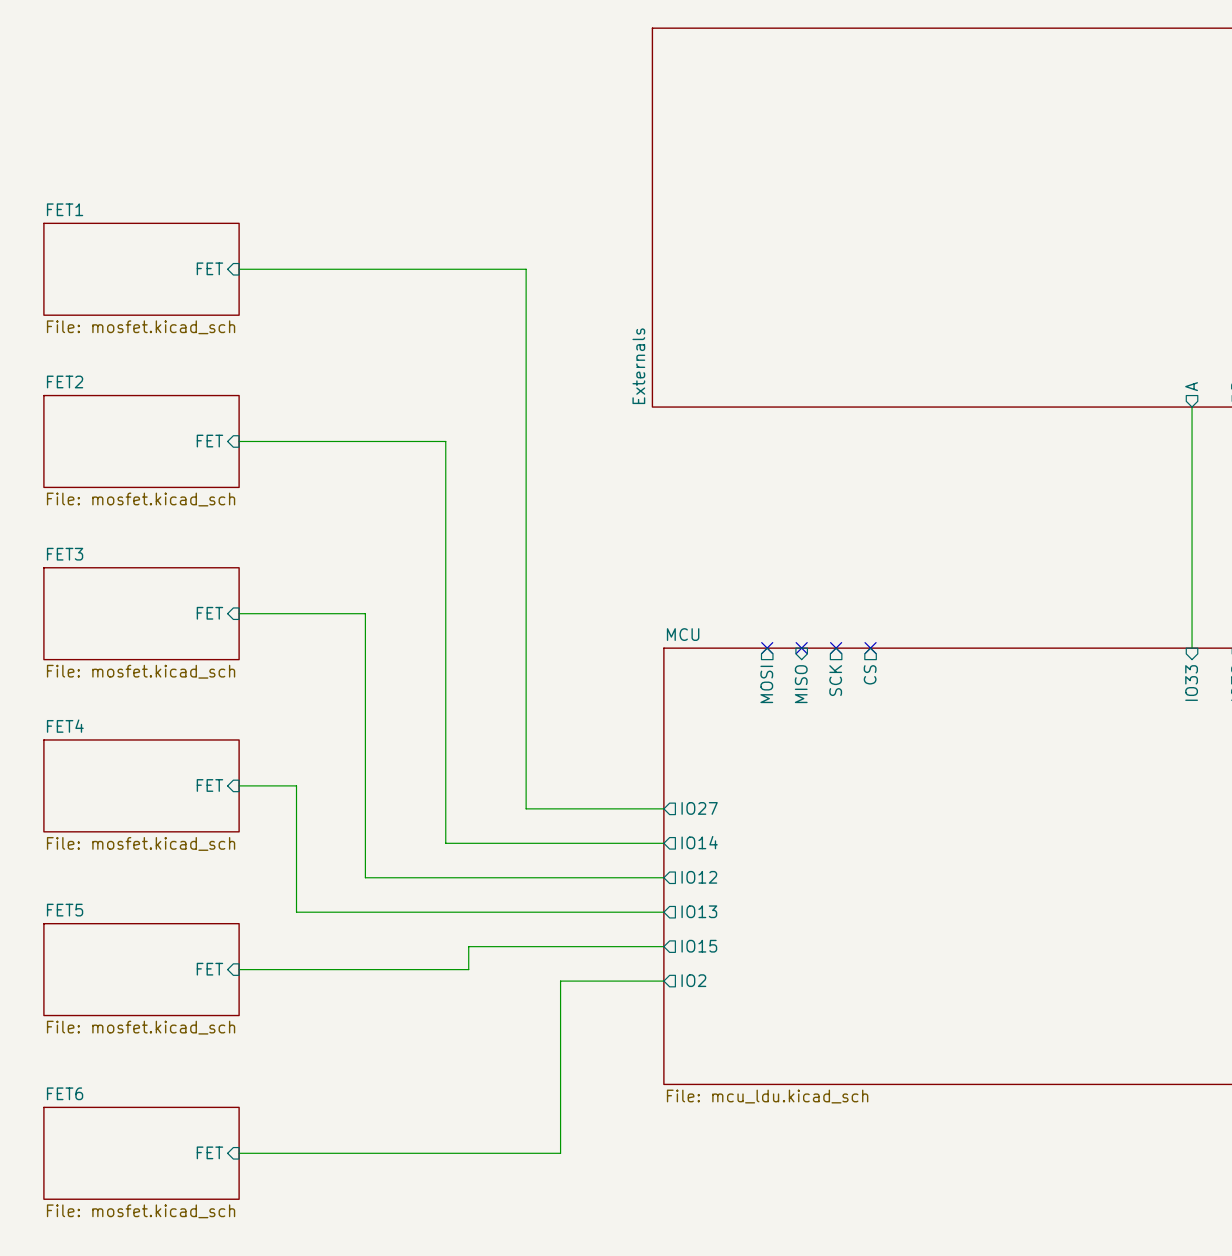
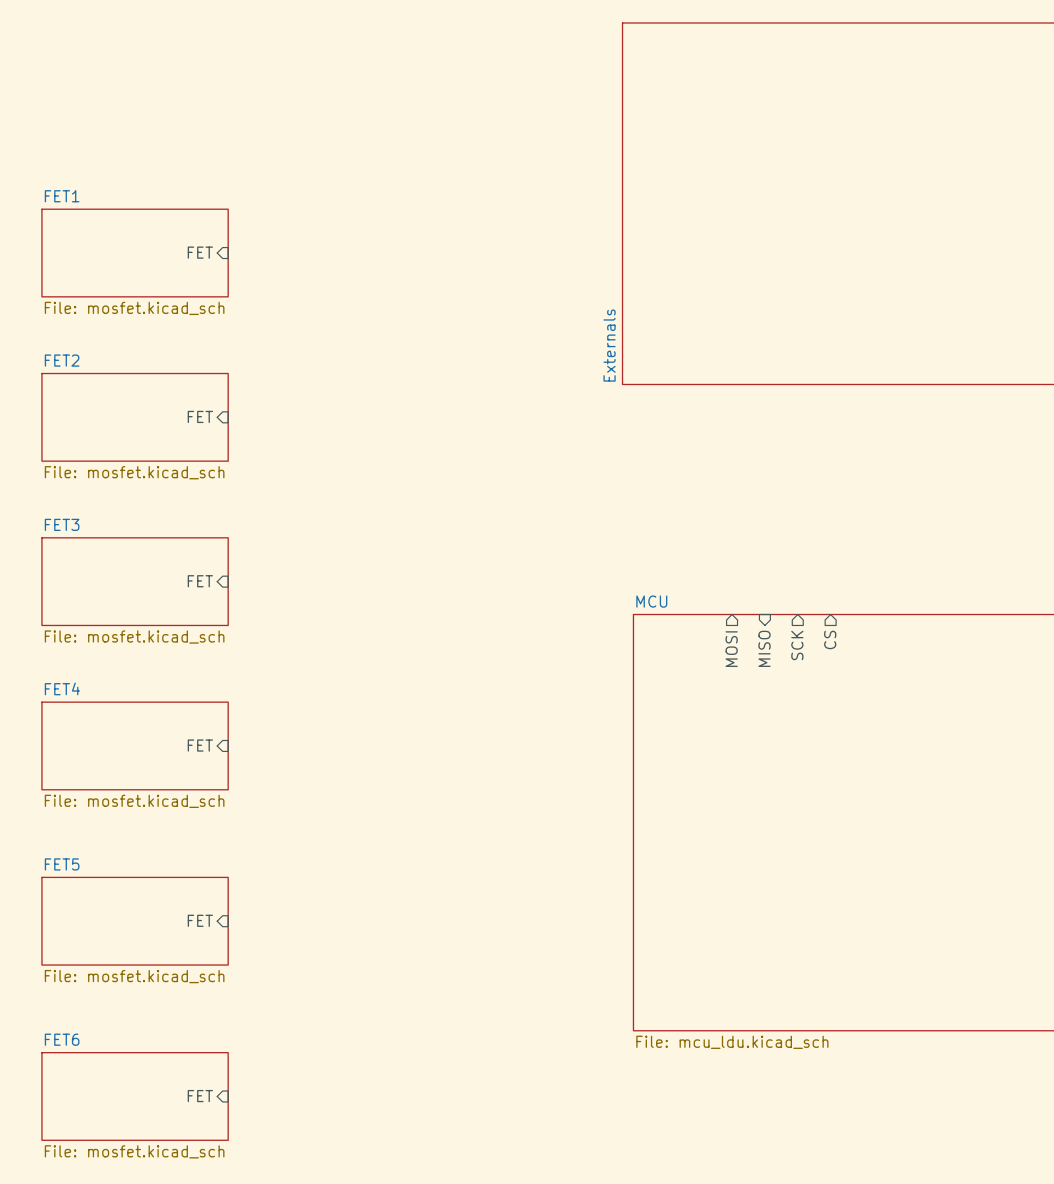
wire: (239, 269) (526, 269) (526, 808) (663, 808) -> none
wire: (239, 441) (445, 441) (445, 843) (663, 843) -> none
wire: (239, 613) (365, 613) (365, 877) (663, 877) -> none
no-connect mark: (767, 648) -> none
no-connect mark: (801, 648) -> none
no-connect mark: (836, 648) -> none
no-connect mark: (870, 648) -> none
wire: (239, 785) (296, 785) (296, 912) (663, 912) -> none
sheet pin: IO27 (699, 808) -> none
sheet pin: IO14 (699, 842) -> none
sheet pin: IO12 (699, 877) -> none
sheet pin: IO13 (699, 911) -> none
wire: (663, 946) (468, 946) (468, 969) (239, 969) -> none
sheet pin: IO15 (699, 946) -> none
sheet pin: IO2 (693, 980) -> none
wire: (663, 981) (560, 981) (560, 1153) (239, 1153) -> none

